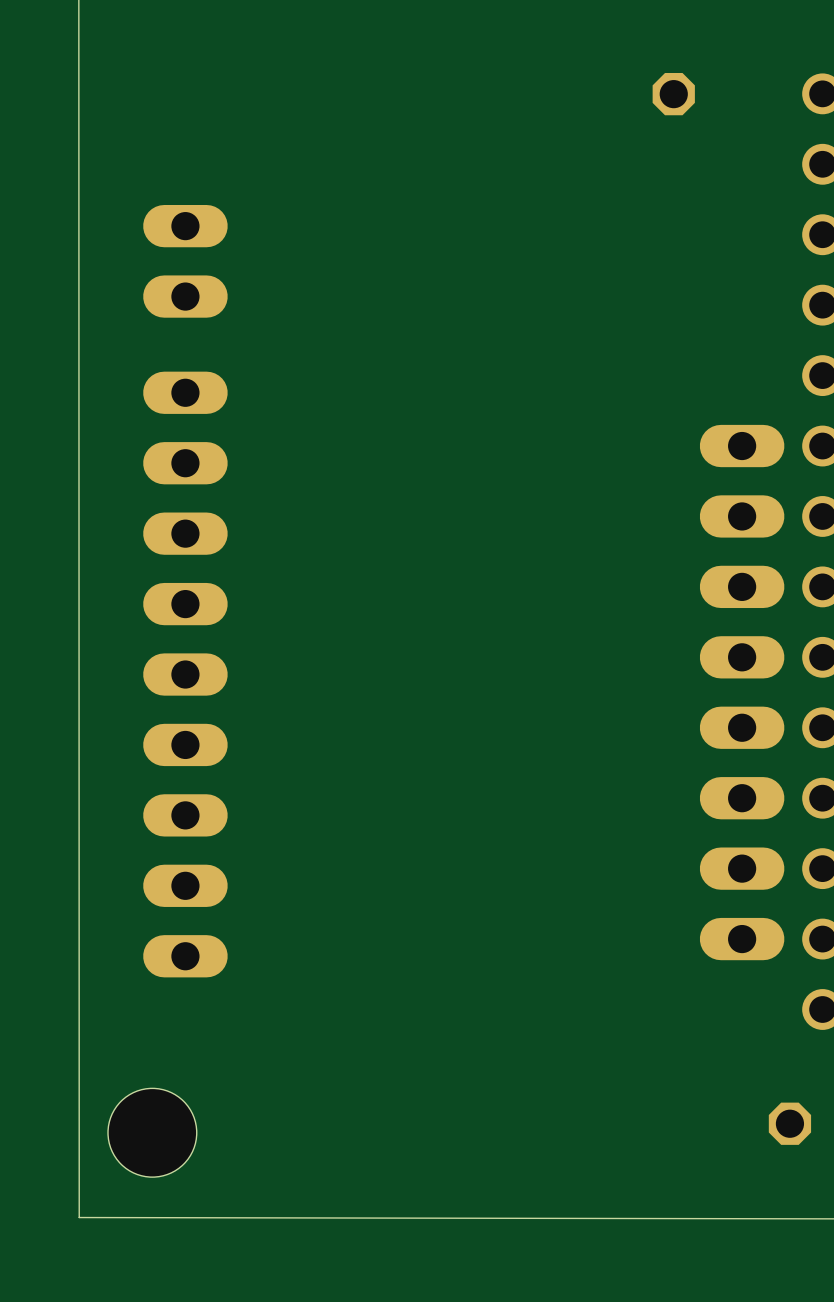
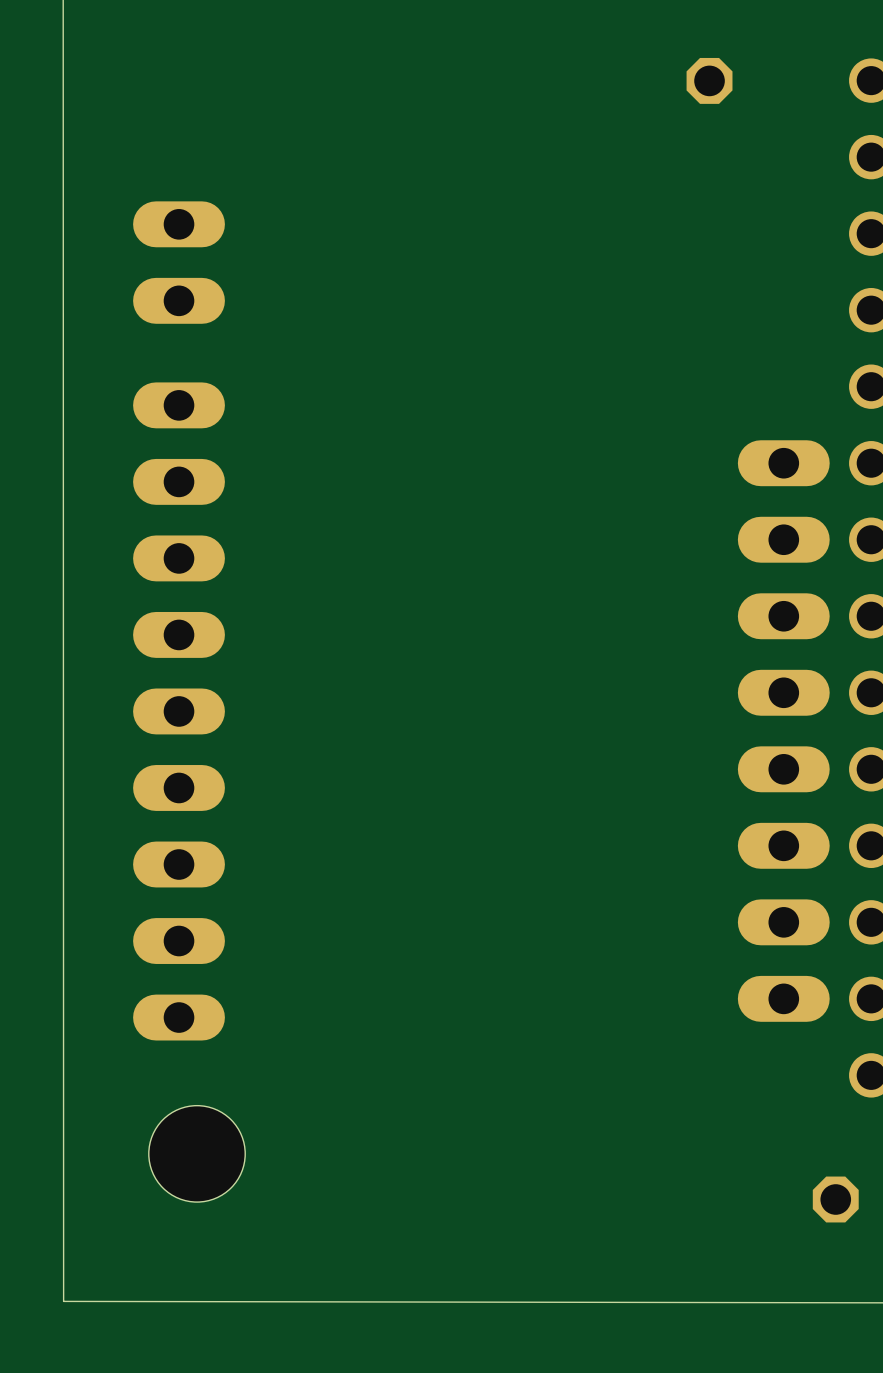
hole position: (152, 1132) -> (197, 1153)

